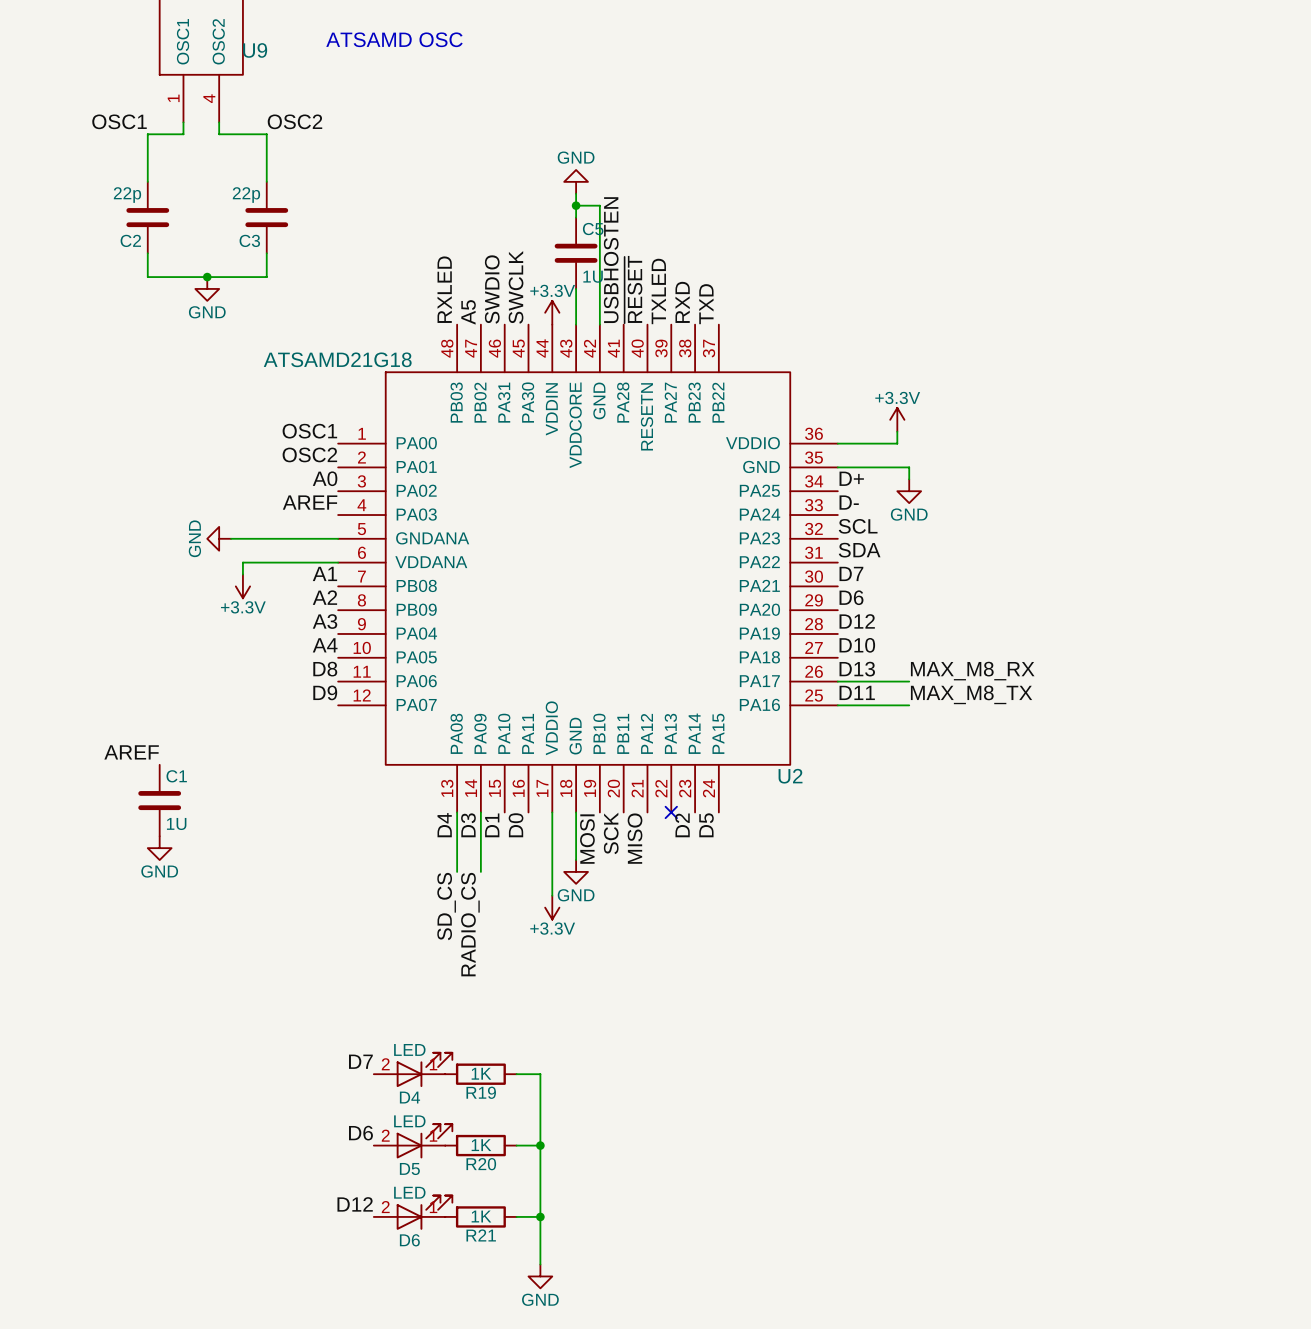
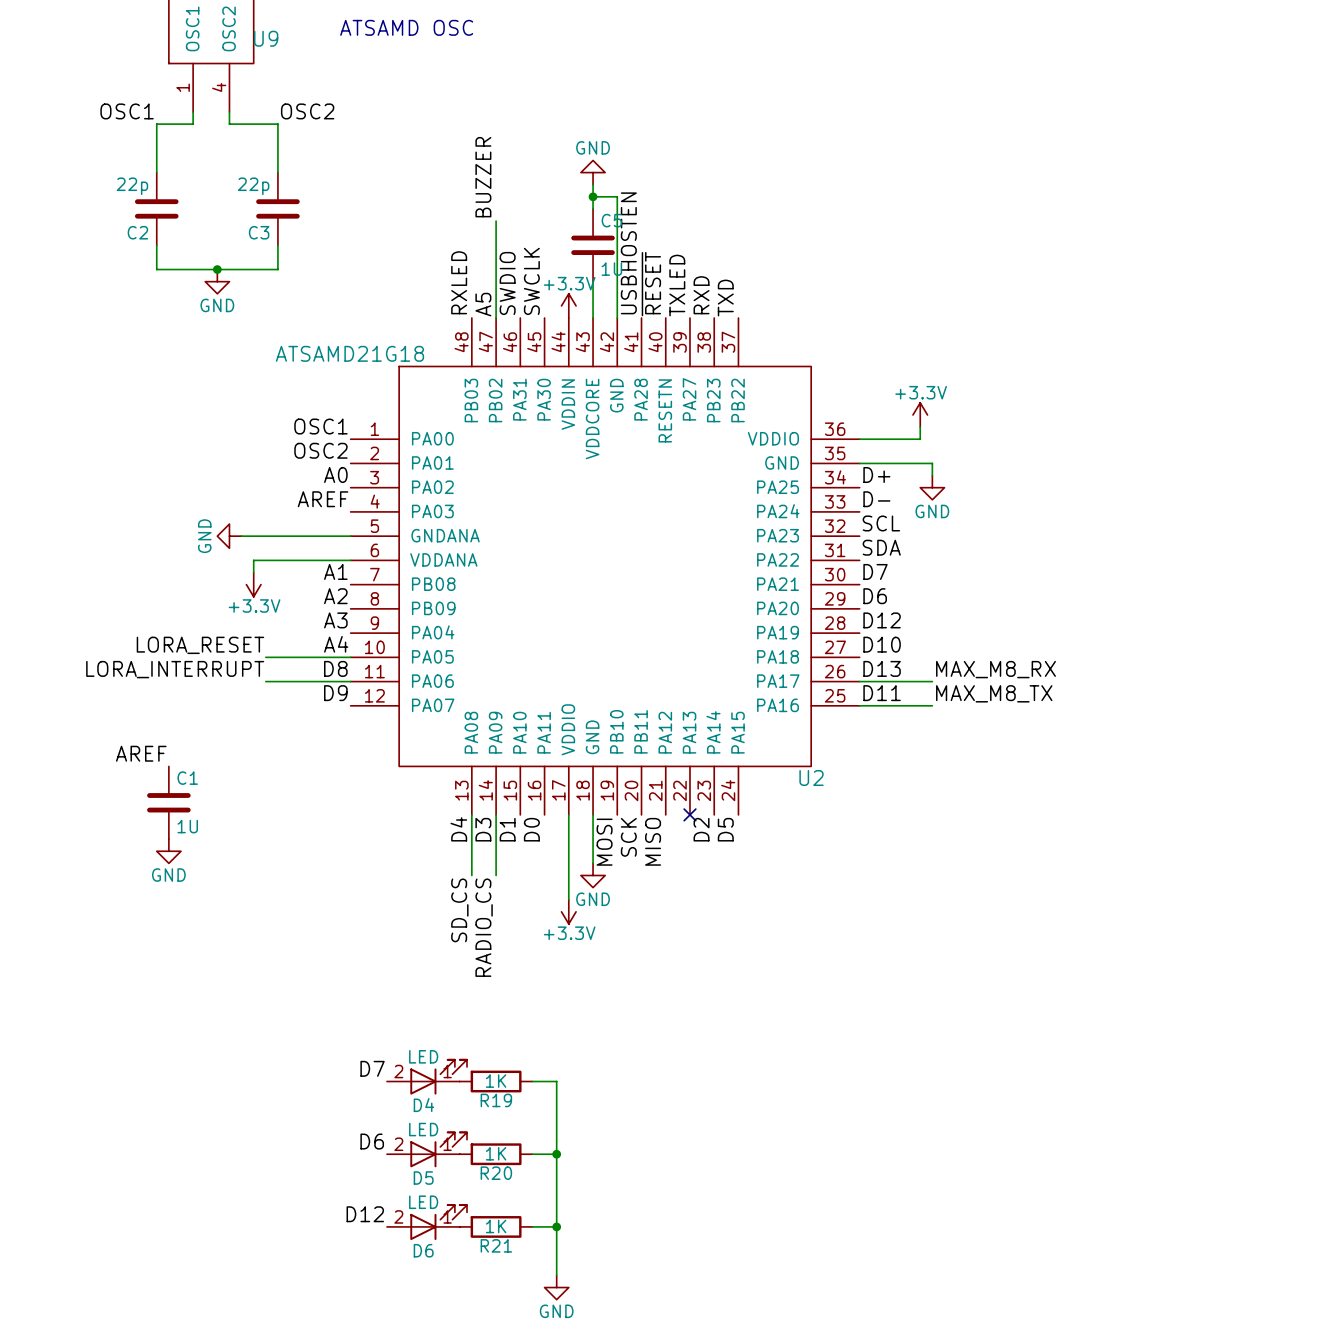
label: none -> BUZZER (483, 177)
wire: none -> (496, 221) (496, 318)
label: none -> LORA_RESET (200, 645)
wire: none -> (265, 657) (350, 657)
label: none -> LORA_INTERRUPT (175, 669)
wire: none -> (265, 681) (350, 681)

